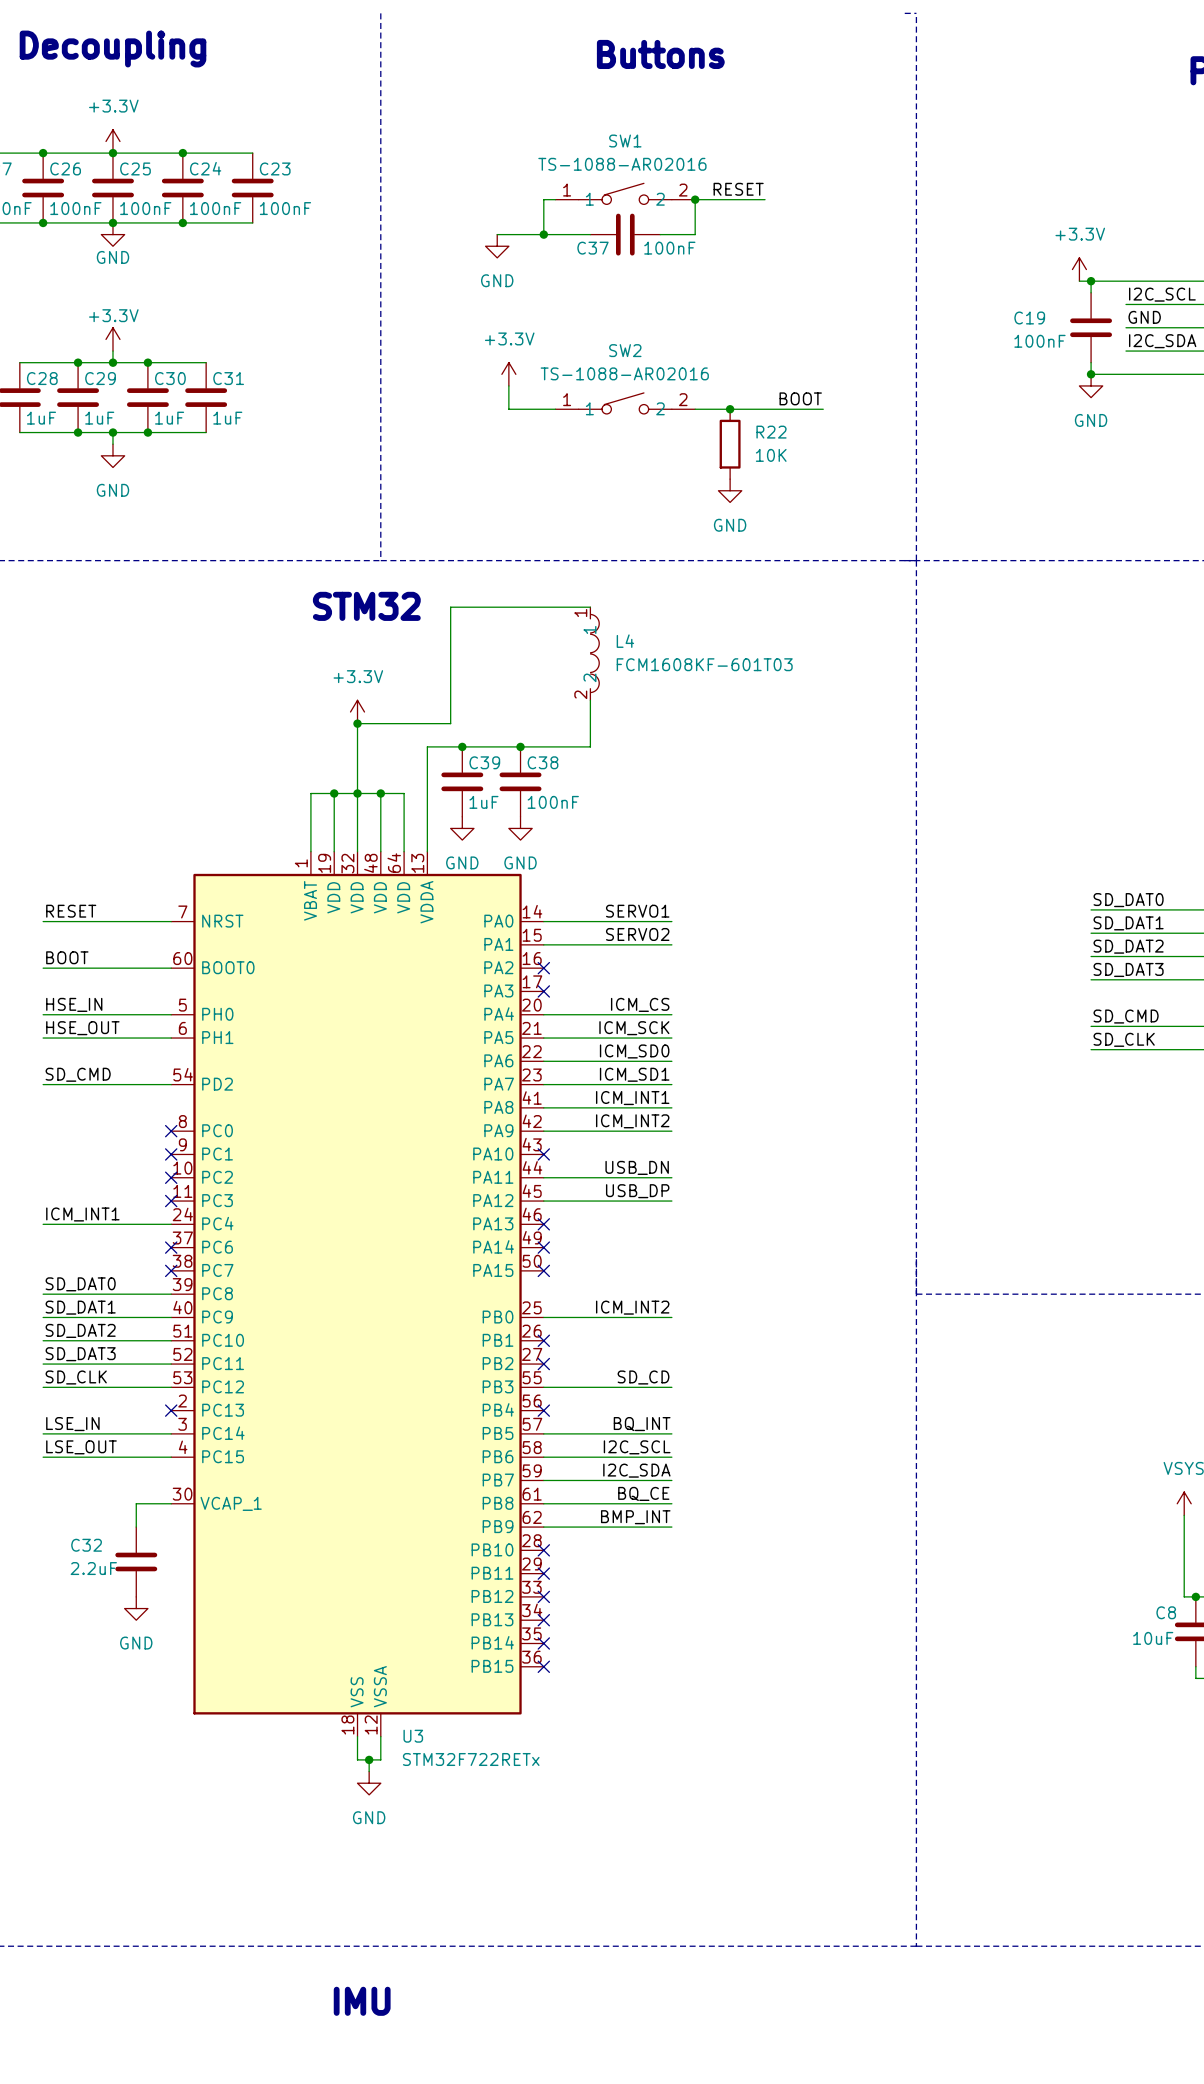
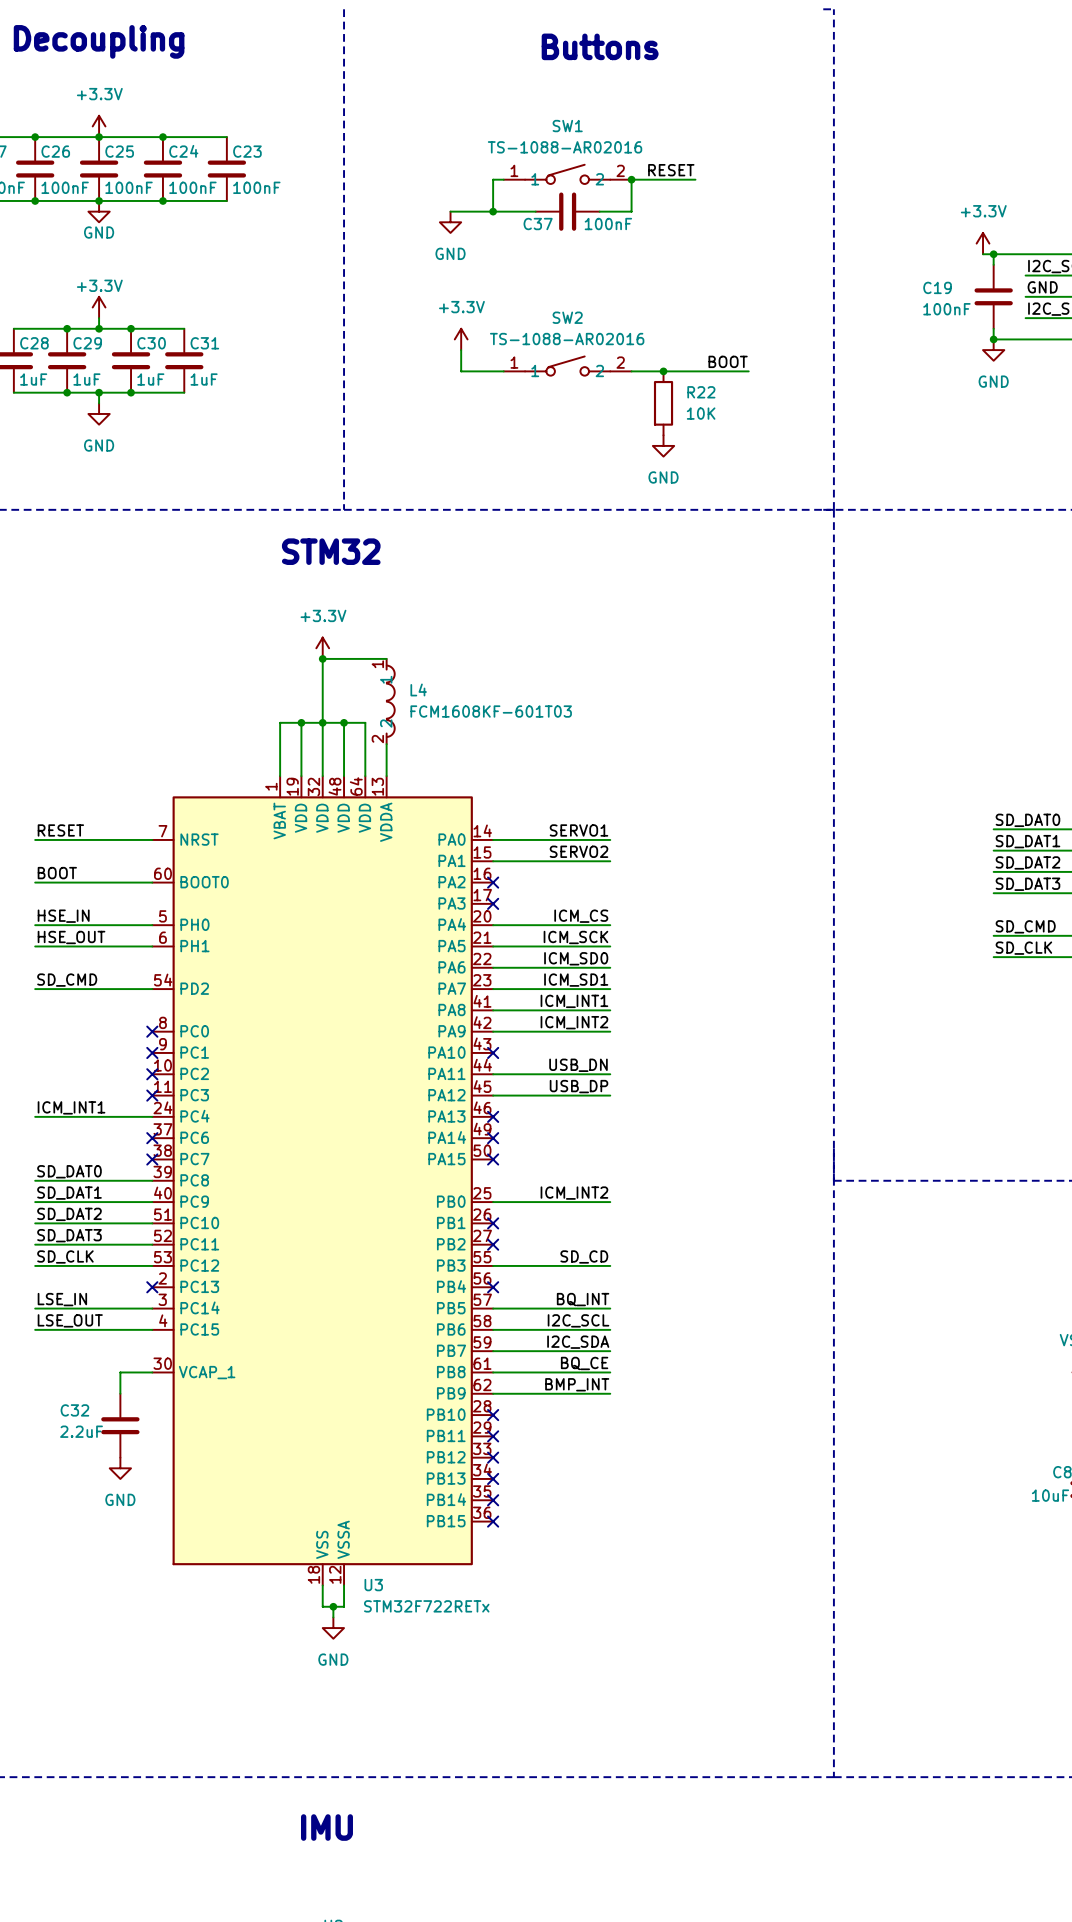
wire: (590, 607) (450, 607) (450, 723) (427, 723) -> none
L4 position: (594, 653) -> (390, 701)
wire: (590, 700) (590, 746) (427, 746) (427, 816) -> none
junction: (462, 746) -> none
junction: (520, 746) -> none
C39: 1uF (462, 781) -> none
C38: 100nF (520, 781) -> none
power symbol: GND (462, 828) -> none
power symbol: GND (520, 828) -> none

